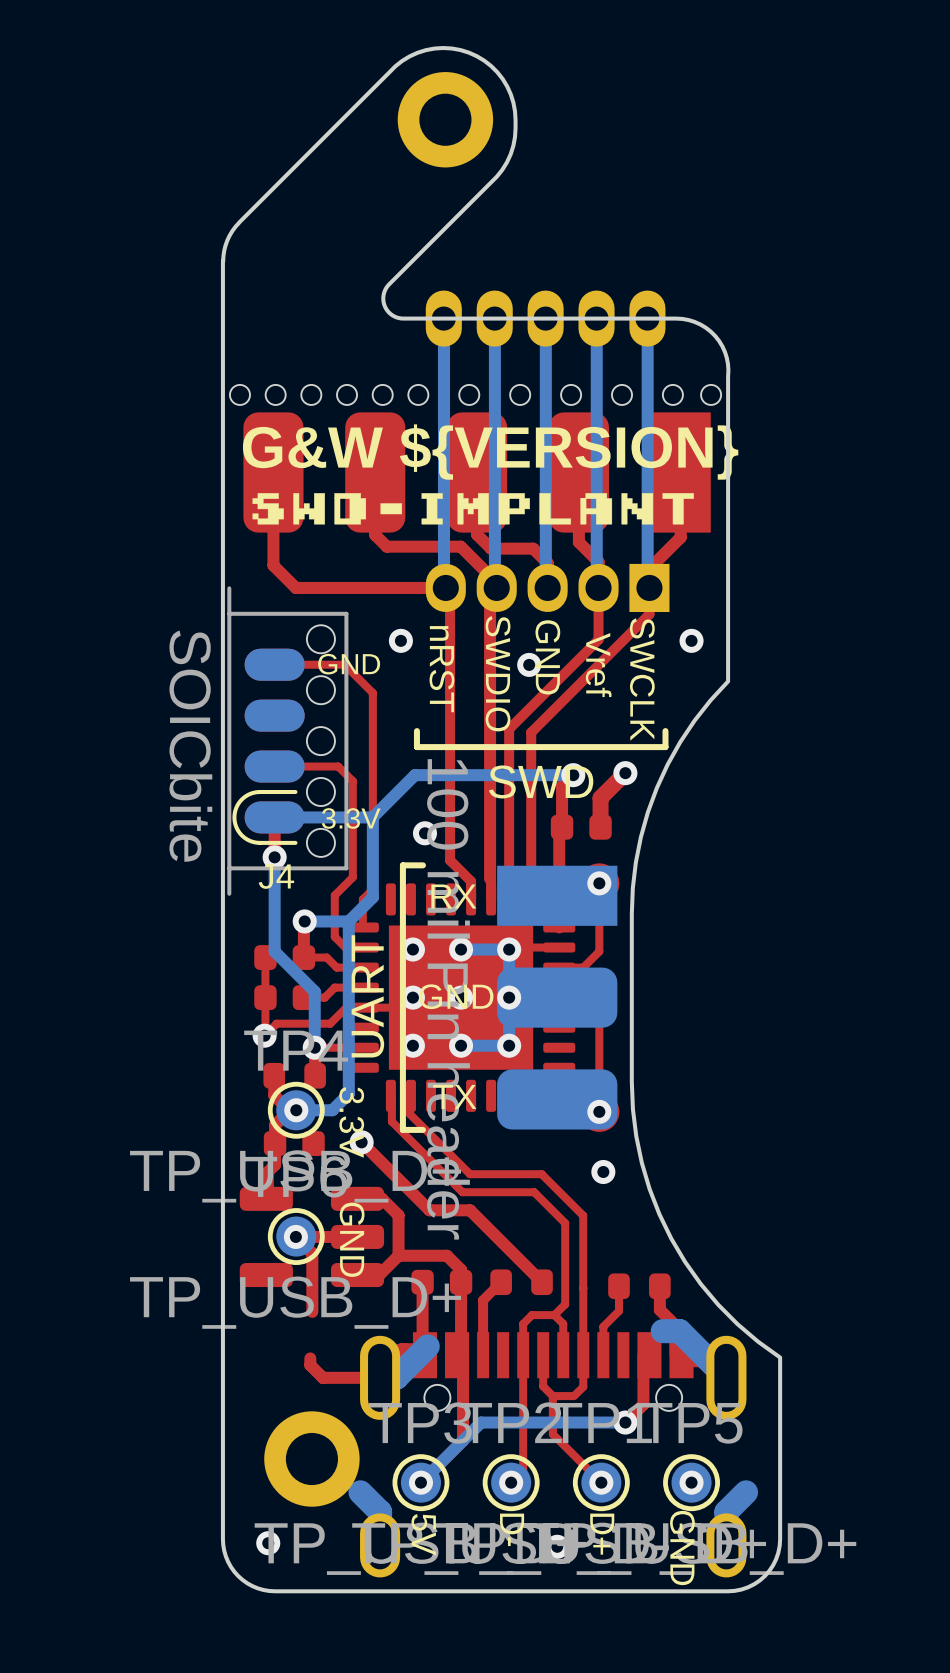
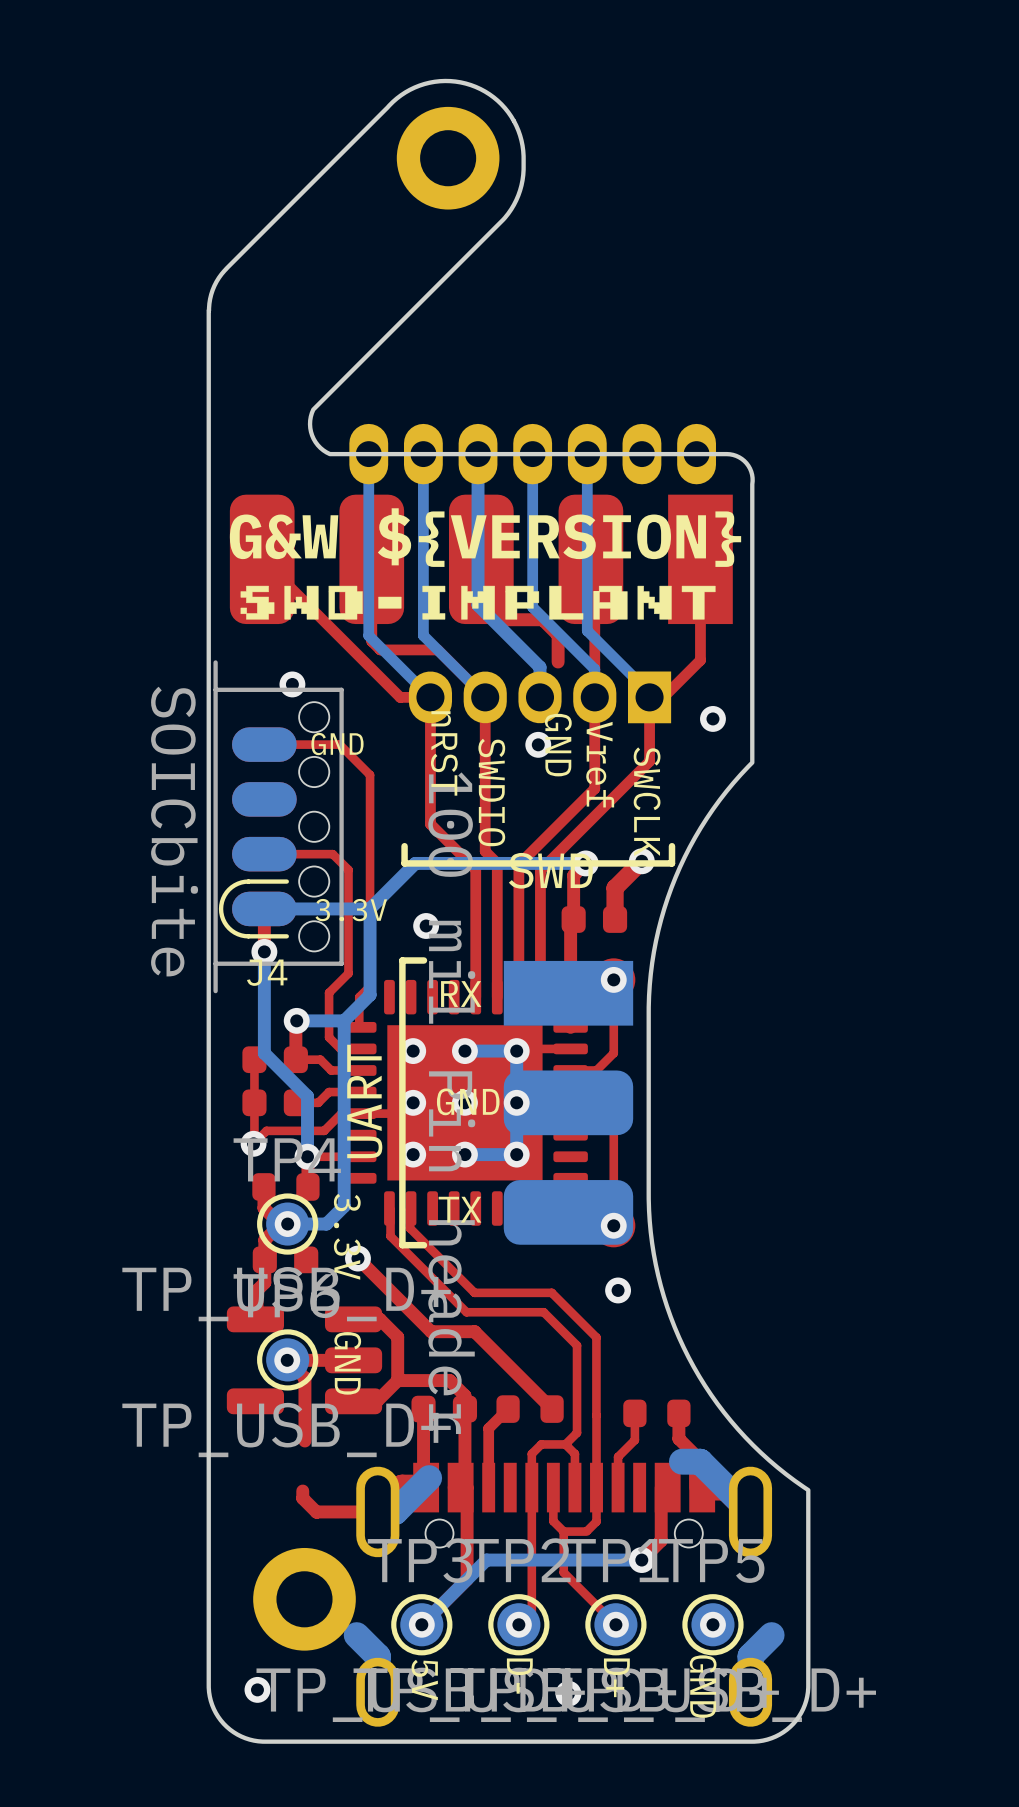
part footprint: [220, 45, 783, 1594] -> [206, 78, 811, 1744]
bottom track: (444, 316) (444, 586) (445, 587) -> none
bottom track: (494, 316) (494, 586) (496, 587) -> none
bottom track: (545, 316) (545, 586) (547, 587) -> none
bottom track: (596, 316) (596, 586) (598, 587) -> none
bottom track: (647, 316) (647, 586) (649, 587) -> none
bottom track: none -> (368, 454) (368, 635) (430, 697)
bottom track: none -> (423, 454) (423, 635) (485, 697)
bottom track: none -> (478, 454) (478, 605) (540, 667) (540, 697)
bottom track: none -> (532, 454) (532, 607) (594, 669) (594, 697)
bottom track: none -> (587, 454) (587, 630) (649, 693) (649, 697)
text position: G&W ${VERSION} (490, 452) -> G&W ${VERSION} (485, 537)
top track: (273, 468) (273, 565) (295, 587) (445, 587) (450, 592) (450, 860) (471, 881) -> (262, 559) (400, 697) (430, 697) (430, 824) (475, 869) (475, 977)
top track: (375, 472) (375, 535) (386, 546) (460, 546) (496, 582) (496, 587) (490, 594) (491, 879) -> (371, 559) (371, 641) (380, 649) (437, 649) (485, 697) (485, 851) (497, 863) (497, 976)
part position: (477, 472) -> (481, 559)
top track: (578, 472) (578, 542) (598, 561) (598, 639) (509, 729) (509, 897) (511, 899) -> (590, 559) (594, 563) (594, 788) (518, 864) (518, 997)
top track: (680, 472) (680, 537) (649, 568) (649, 614) (531, 732) (531, 781) -> (700, 559) (700, 660) (663, 697) (649, 697) (649, 761) (540, 870)
drawing position: (473, 508) -> (478, 602)
part position: (547, 587) -> (540, 697)
via position: (400, 640) -> (292, 684)
text position: Vref (598, 665) -> Vref (600, 764)
text position: SWDIO (498, 673) -> SWDIO (491, 792)
text position: SWCLK (642, 679) -> SWCLK (647, 801)
line: (665, 731) (665, 747) (416, 747) (416, 731) -> (671, 846) (671, 863) (404, 863) (404, 846)

